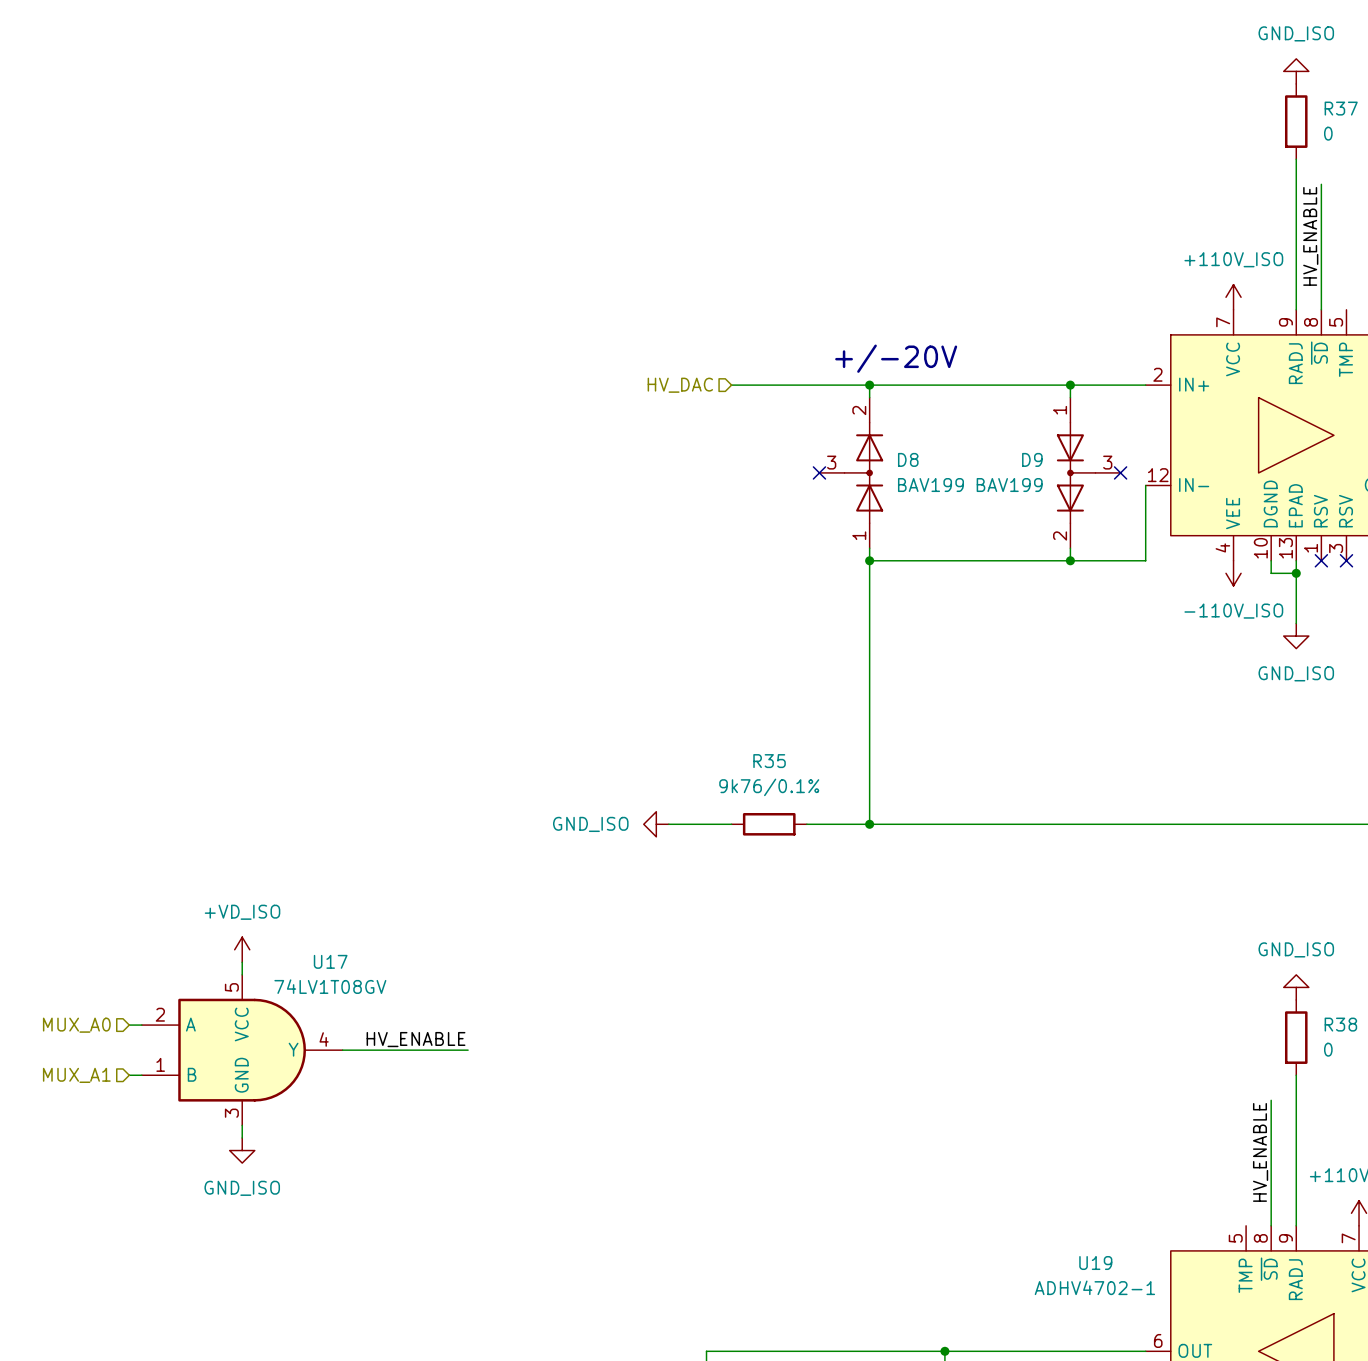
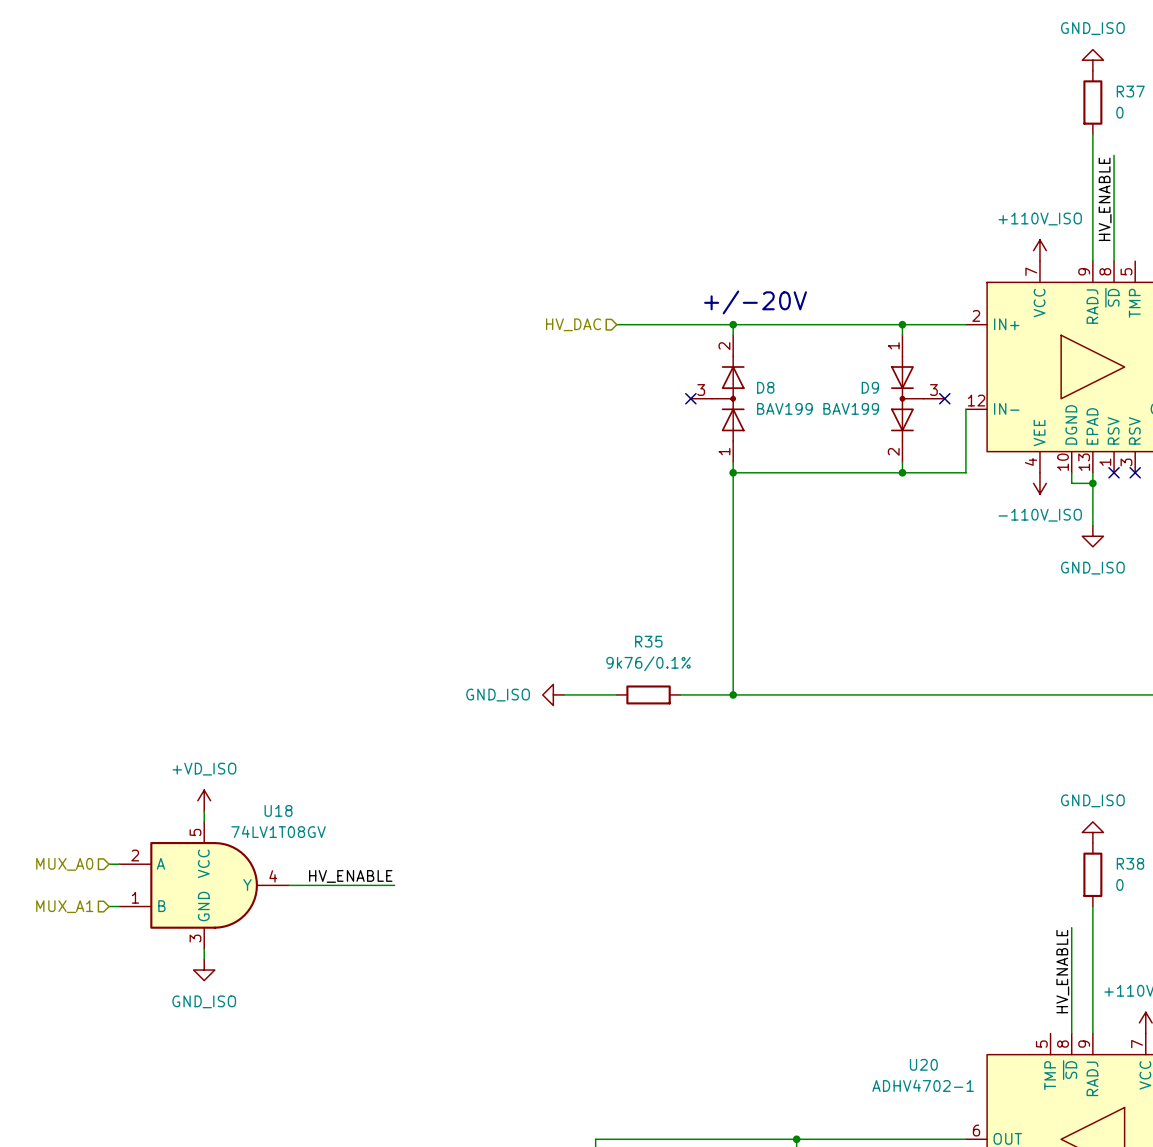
U17 name: U17 (330, 961) -> U18 (278, 810)
U19 name: U19 (1095, 1263) -> U20 (923, 1064)

